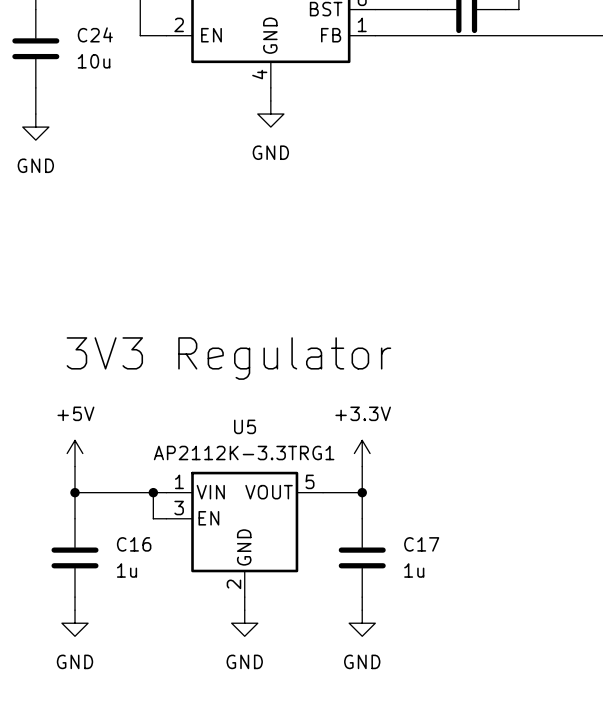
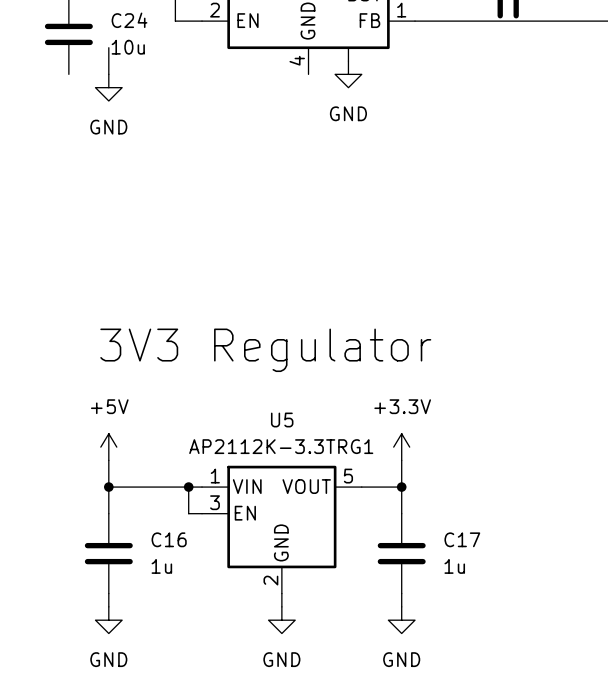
wire: (35, 87) (35, 114) -> (108, 47) (108, 74)
wire: (270, 87) (270, 100) -> (348, 47) (348, 61)
power symbol position: GND (270, 114) -> GND (348, 74)
power symbol position: GND (35, 127) -> GND (108, 87)

